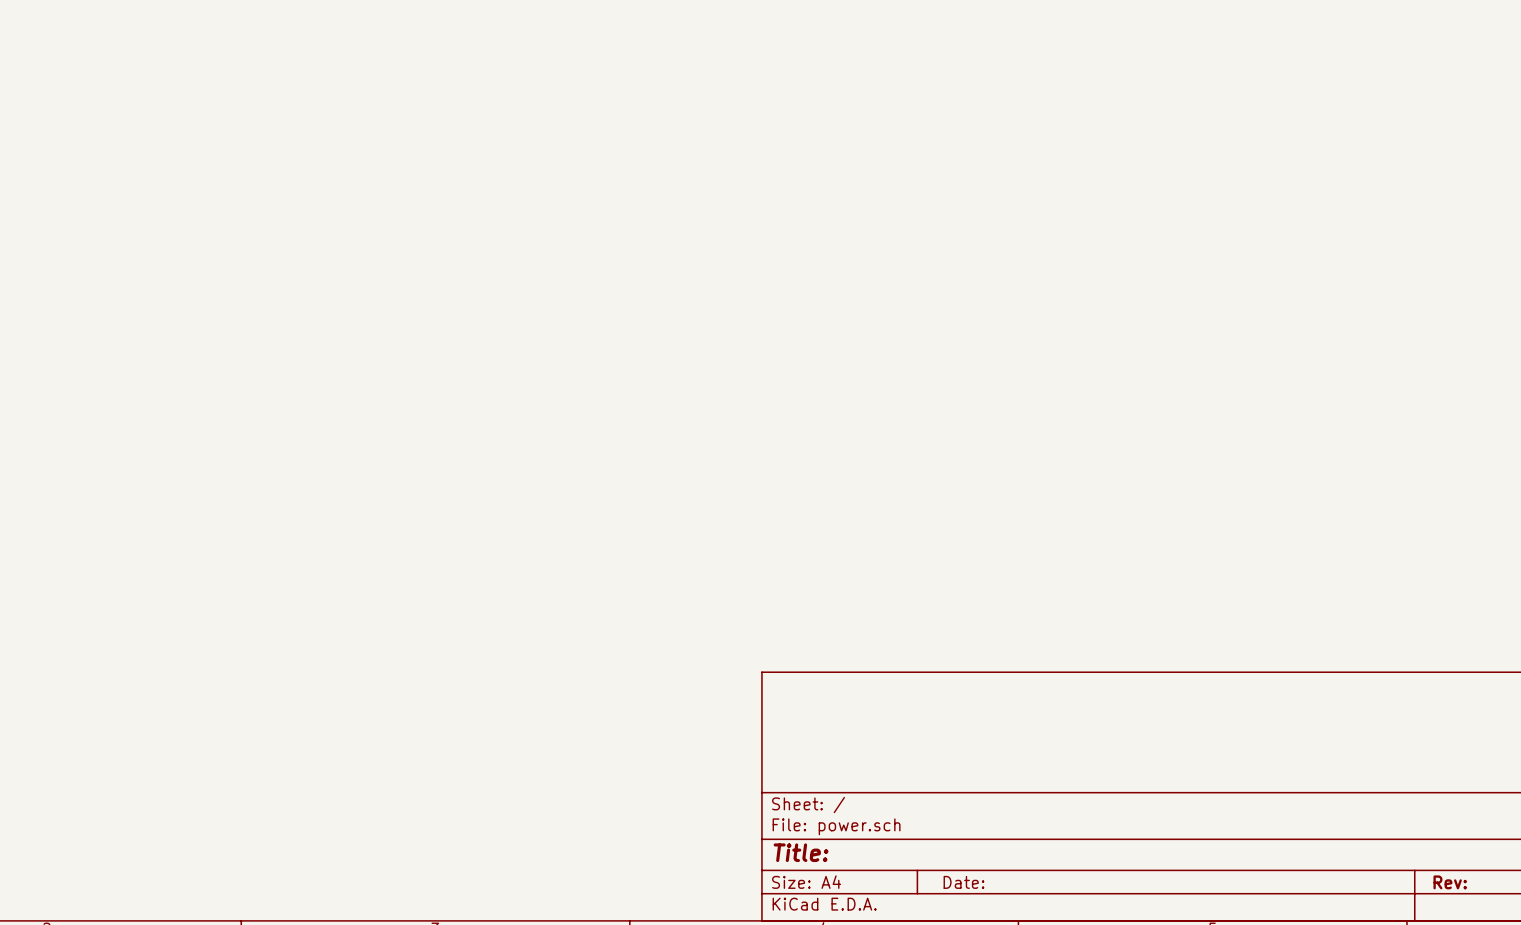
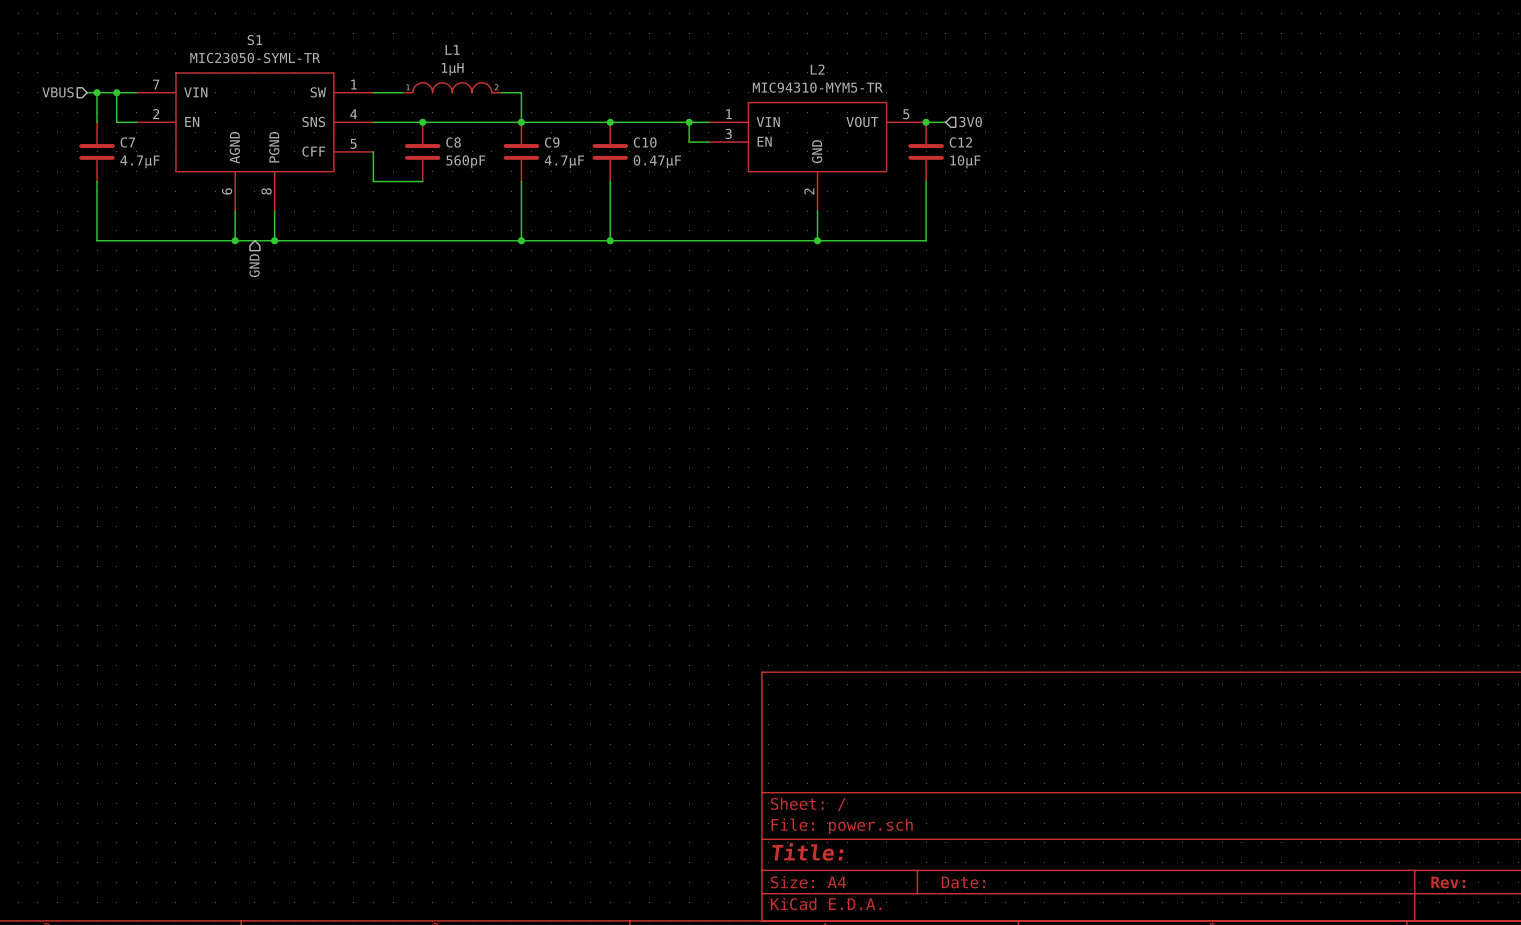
L1: none -> 1µH (452, 87)
hierarchical label: none -> VBUS (58, 92)
wire: none -> (87, 92) (136, 92)
wire: none -> (97, 92) (97, 122)
junction: none -> (97, 92)
wire: none -> (116, 92) (116, 122) (136, 122)
junction: none -> (116, 92)
wire: none -> (373, 92) (402, 92)
wire: none -> (501, 92) (521, 92) (521, 122)
hierarchical label: none -> 3V0 (970, 121)
wire: none -> (373, 122) (708, 122)
junction: none -> (422, 122)
junction: none -> (521, 122)
junction: none -> (610, 122)
wire: none -> (689, 122) (689, 142) (708, 142)
junction: none -> (689, 122)
wire: none -> (926, 122) (945, 122)
junction: none -> (926, 122)
S1: none -> MIC23050-SYML-TR (254, 142)
C7: none -> 4.7µF (97, 151)
wire: none -> (373, 151) (373, 181) (422, 181)
C8: none -> 560pF (422, 151)
C9: none -> 4.7µF (521, 151)
C10: none -> 0.47µF (610, 151)
C12: none -> 10µF (926, 151)
L2: none -> MIC94310-MYM5-TR (817, 156)
wire: none -> (97, 181) (97, 240) (926, 240) (926, 181)
wire: none -> (521, 181) (521, 240)
wire: none -> (610, 181) (610, 240)
wire: none -> (235, 211) (235, 240)
wire: none -> (274, 211) (274, 240)
wire: none -> (817, 211) (817, 240)
junction: none -> (235, 240)
junction: none -> (274, 240)
junction: none -> (521, 240)
junction: none -> (610, 240)
junction: none -> (817, 240)
hierarchical label: none -> GND (254, 265)

